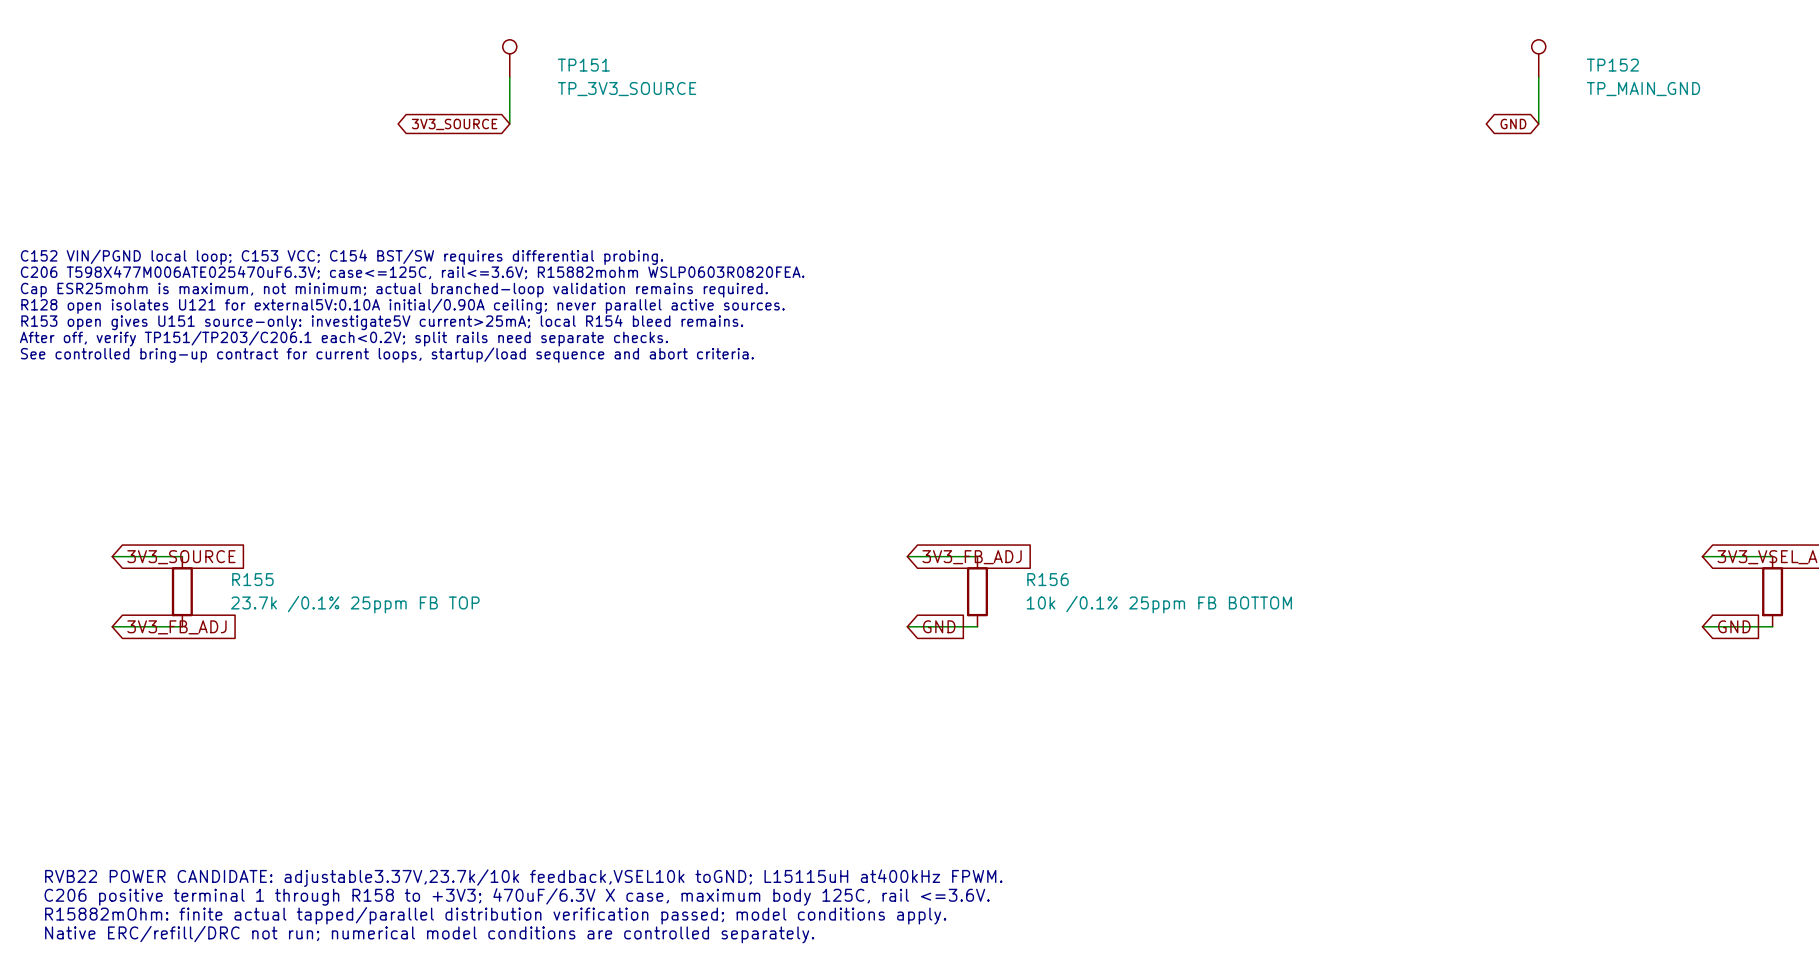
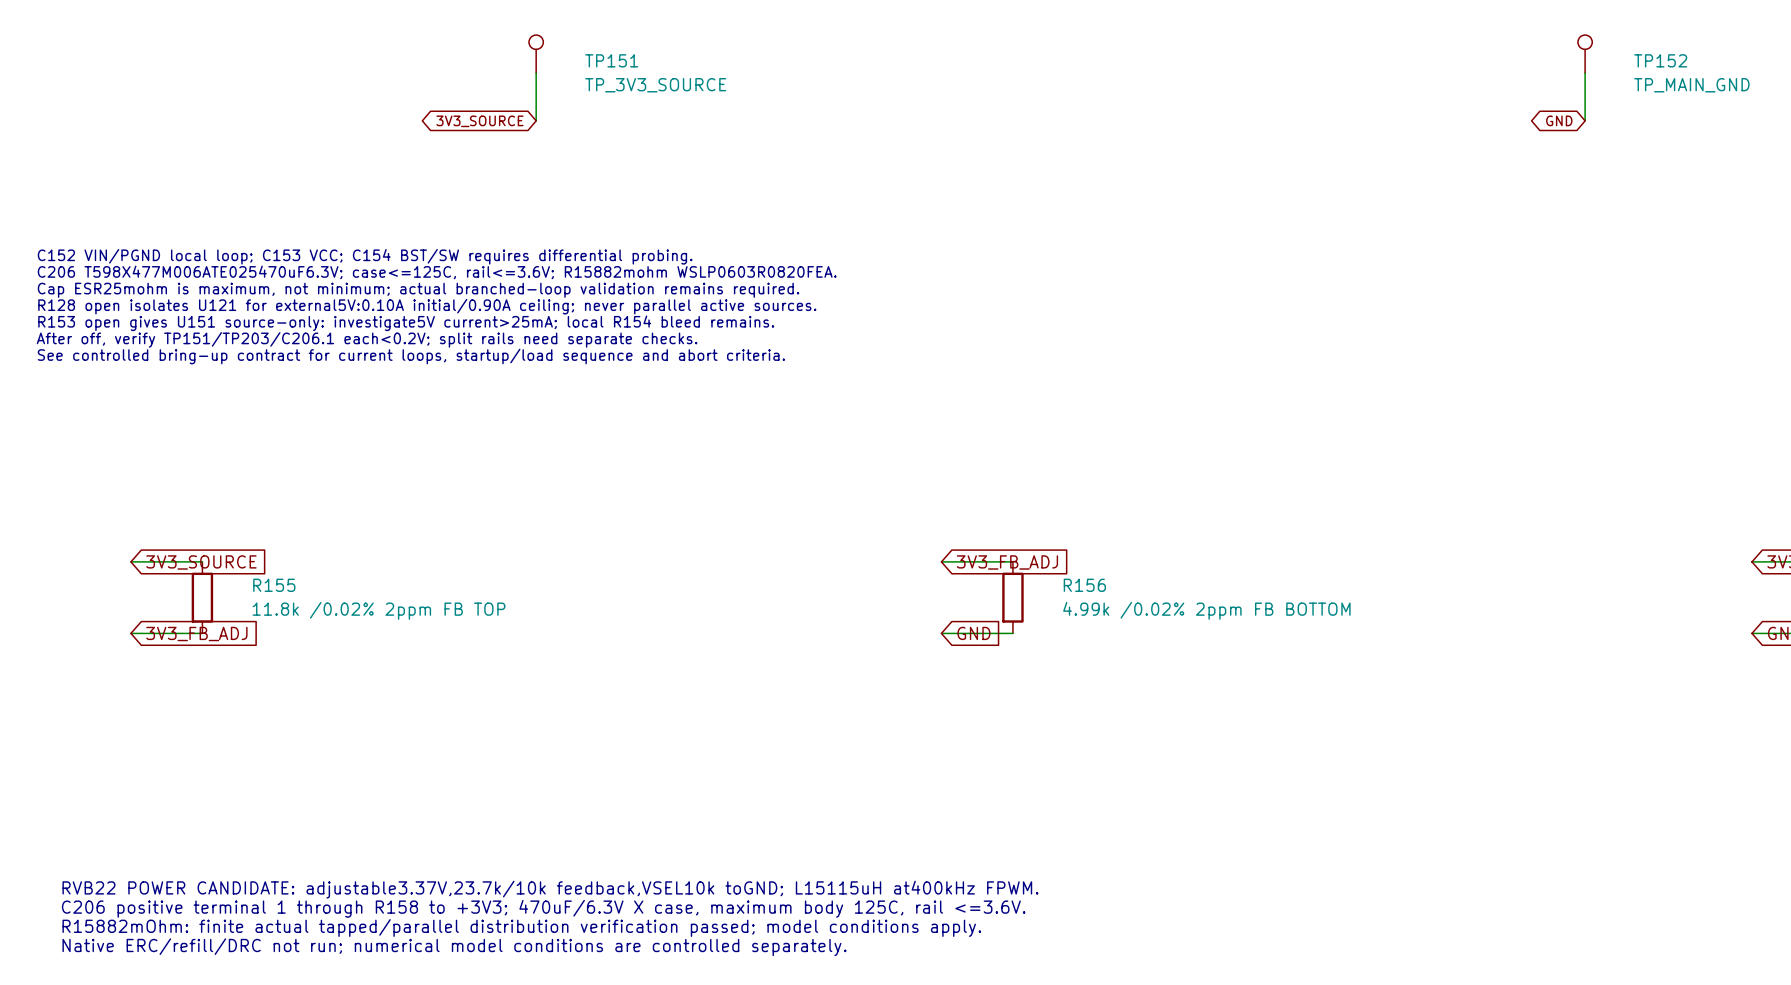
R155 value: 23.7k /0.1% 25ppm FB TOP (355, 604) -> 11.8k /0.02% 2ppm FB TOP (379, 610)
R156 value: 10k /0.1% 25ppm FB BOTTOM (1159, 604) -> 4.99k /0.02% 2ppm FB BOTTOM (1206, 610)

